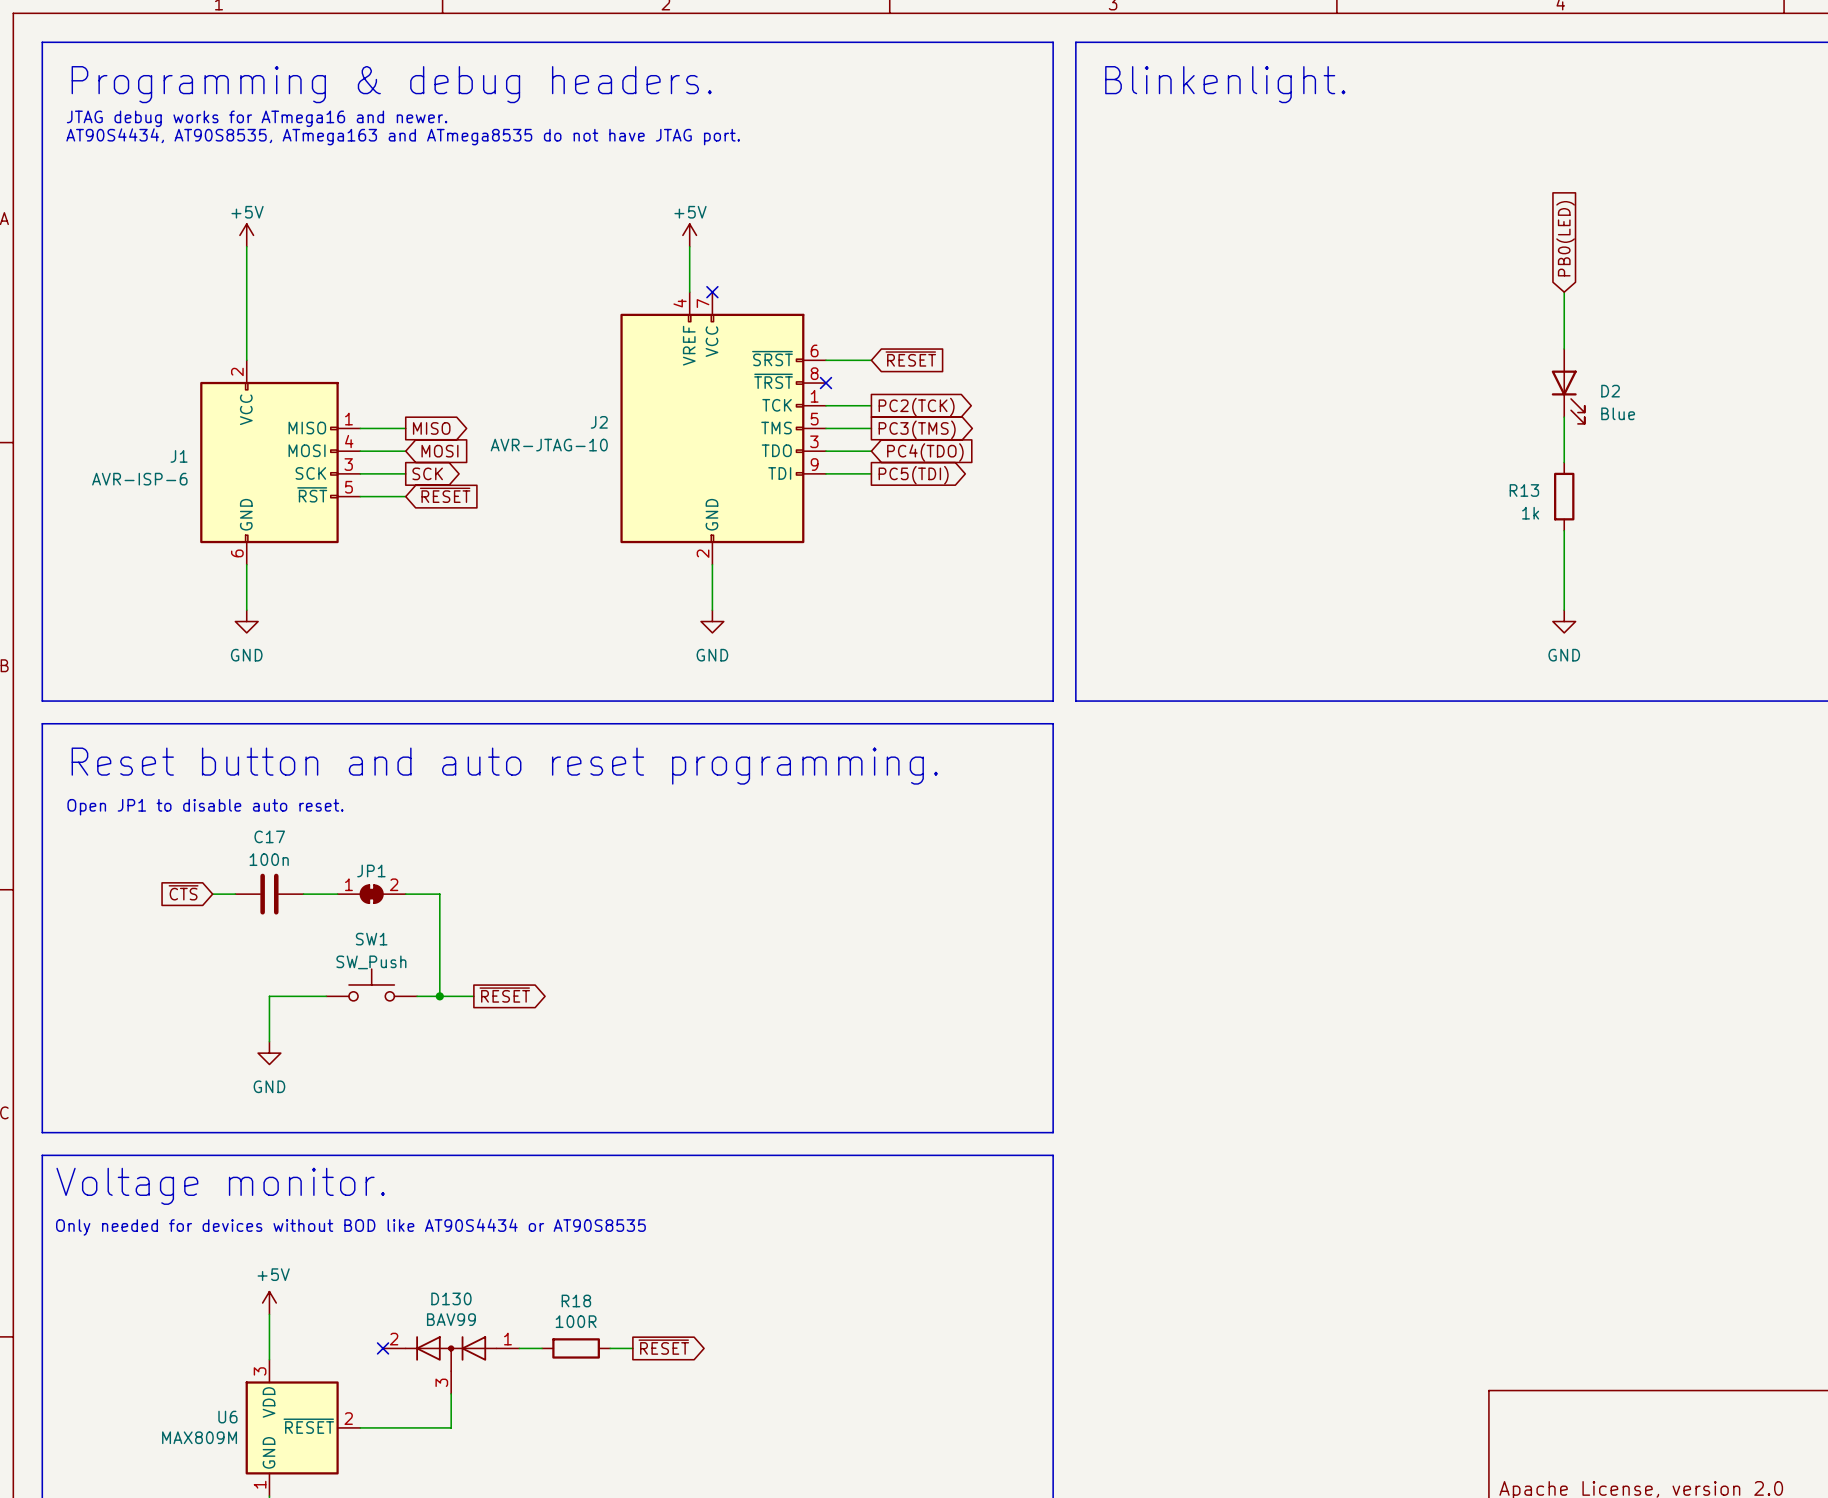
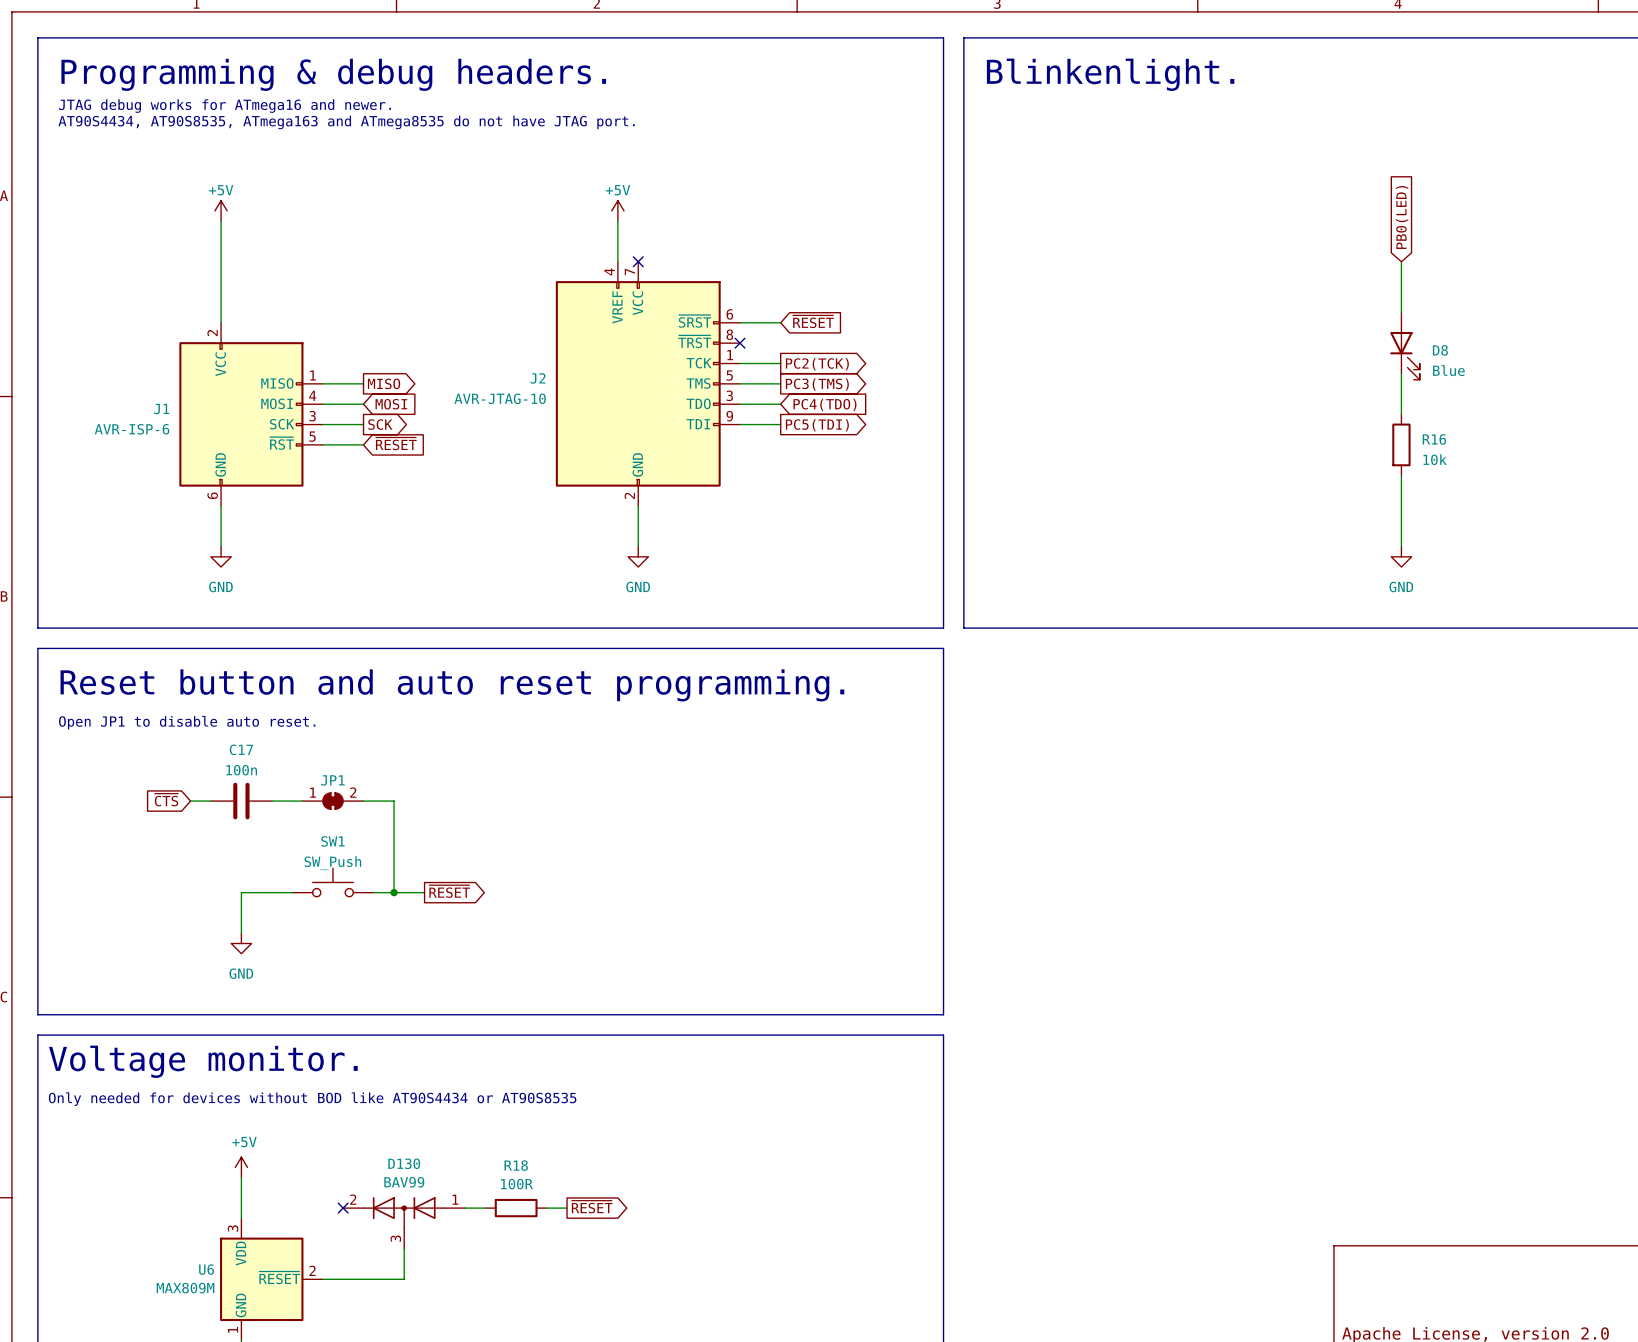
D2 name: D2 (1610, 391) -> D8 (1440, 350)
R13 name: R13 (1524, 490) -> R16 (1434, 439)
R13 value: 1k (1530, 513) -> 10k (1435, 459)

